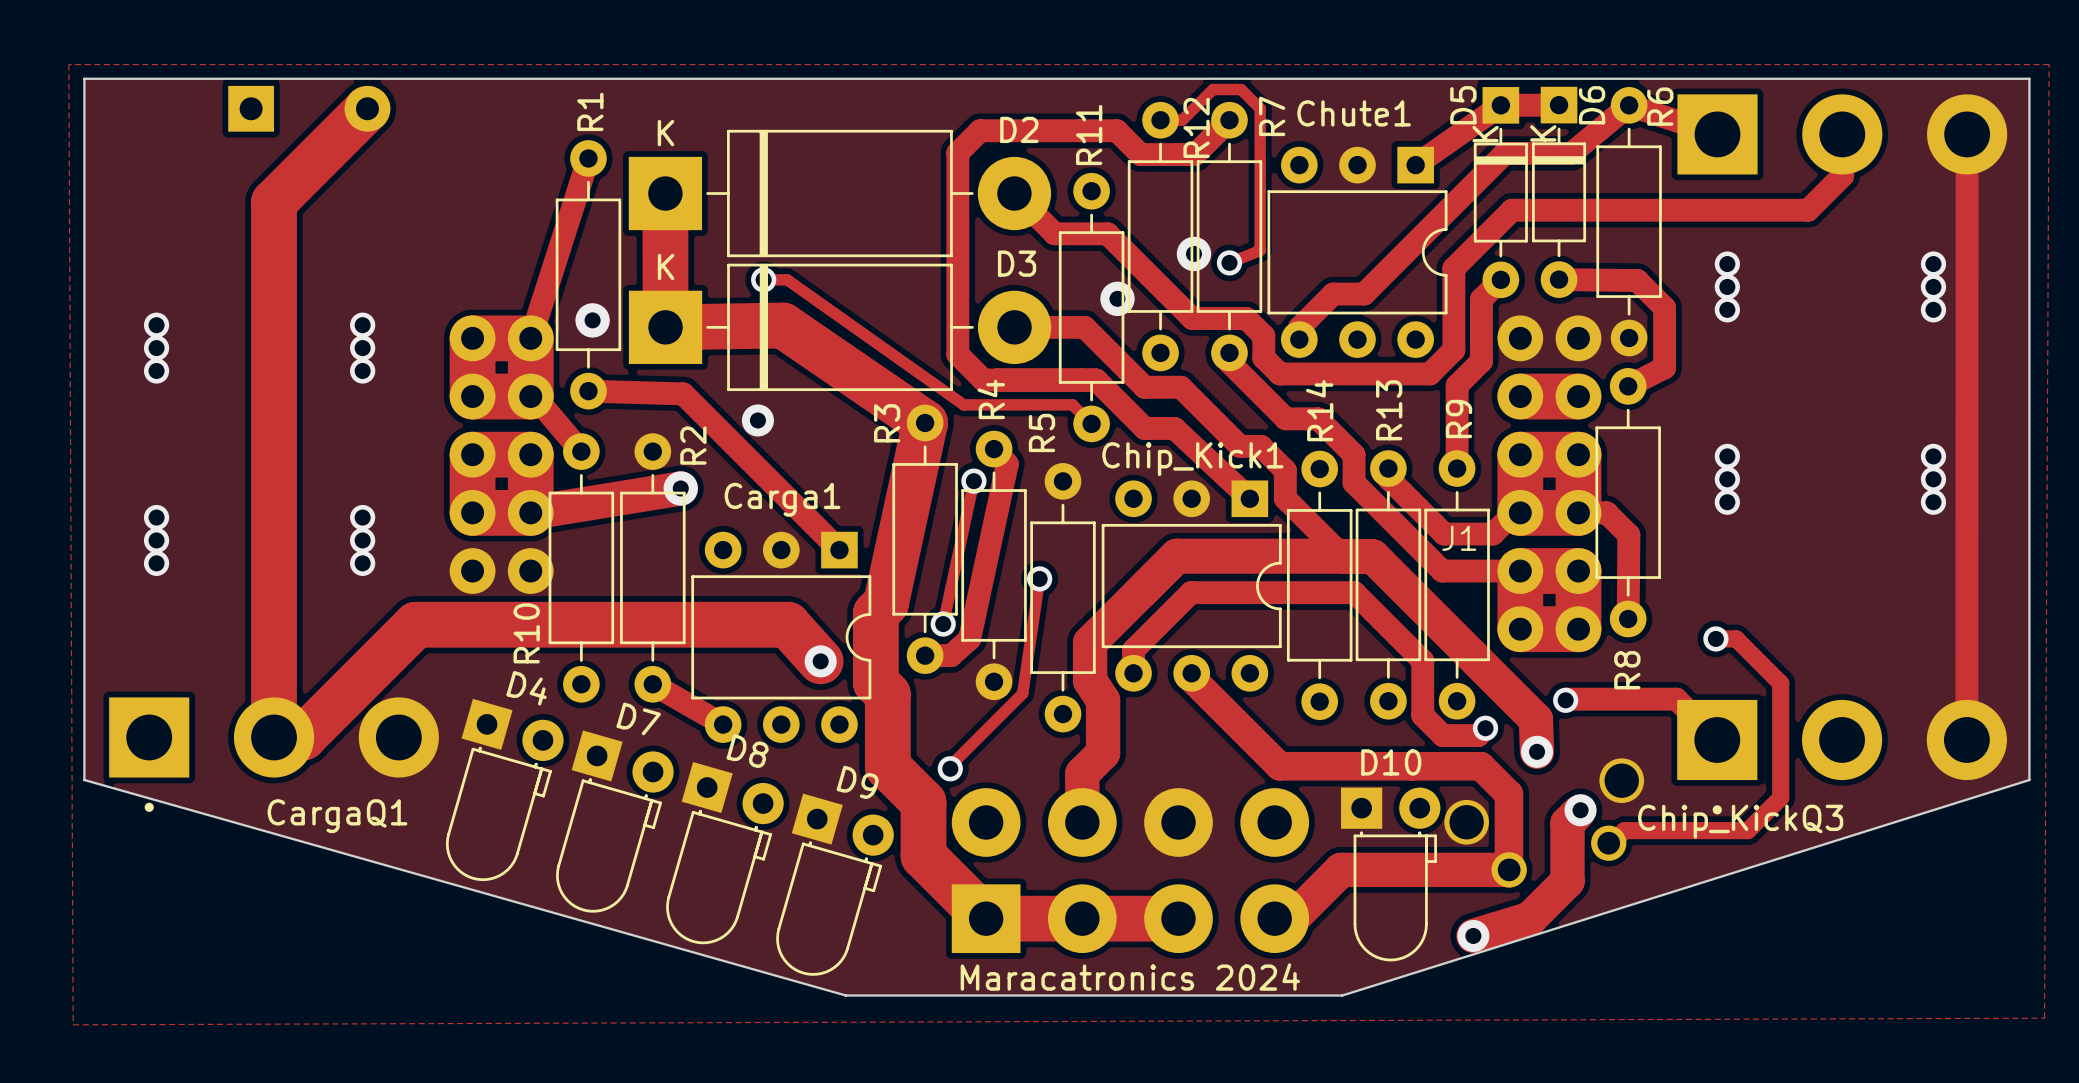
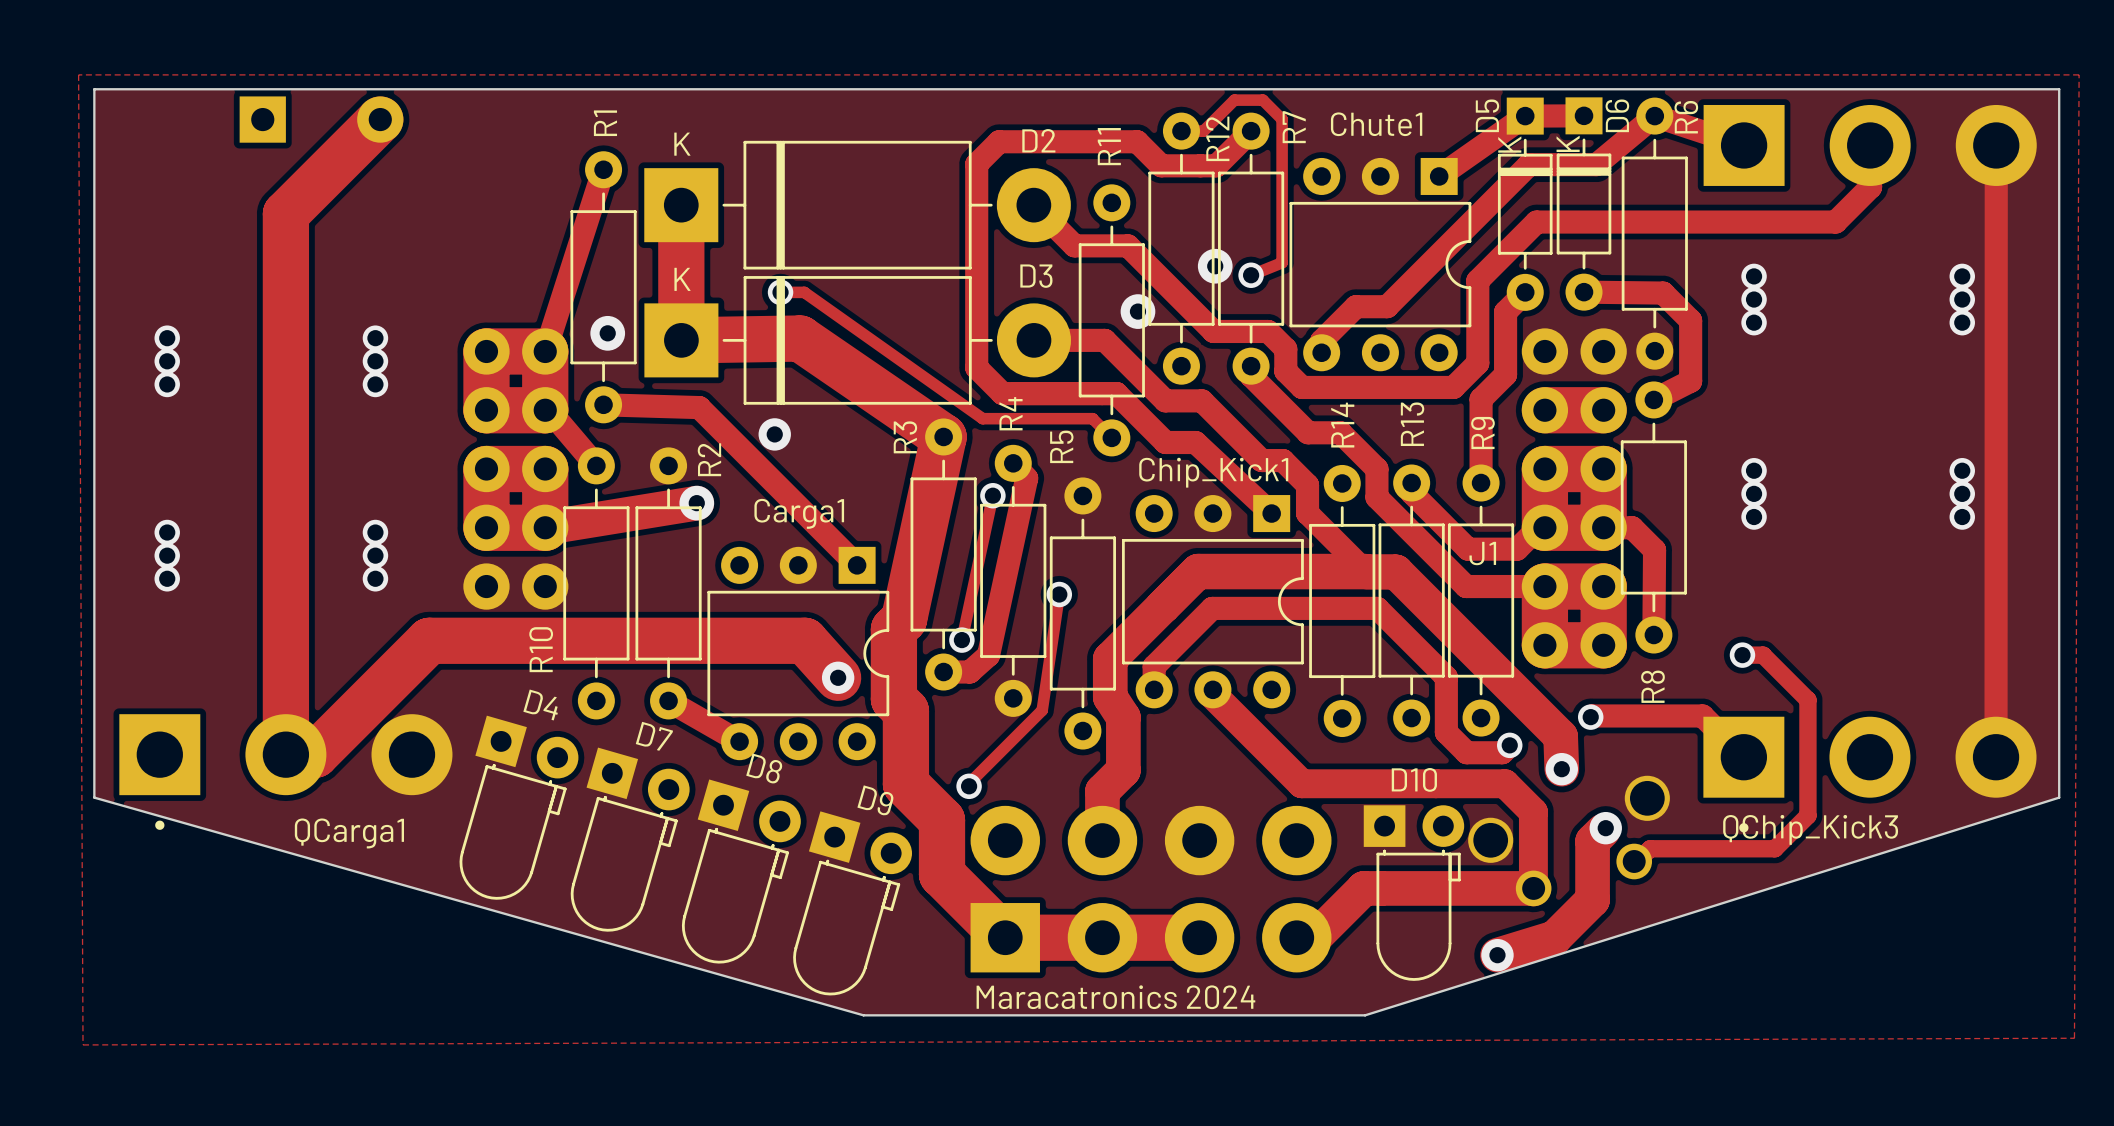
CargaQ1 name: CargaQ1 (337, 816) -> QCarga1 (349, 833)
Chip_KickQ3 name: Chip_KickQ3 (1740, 821) -> QChip_Kick3 (1810, 829)

